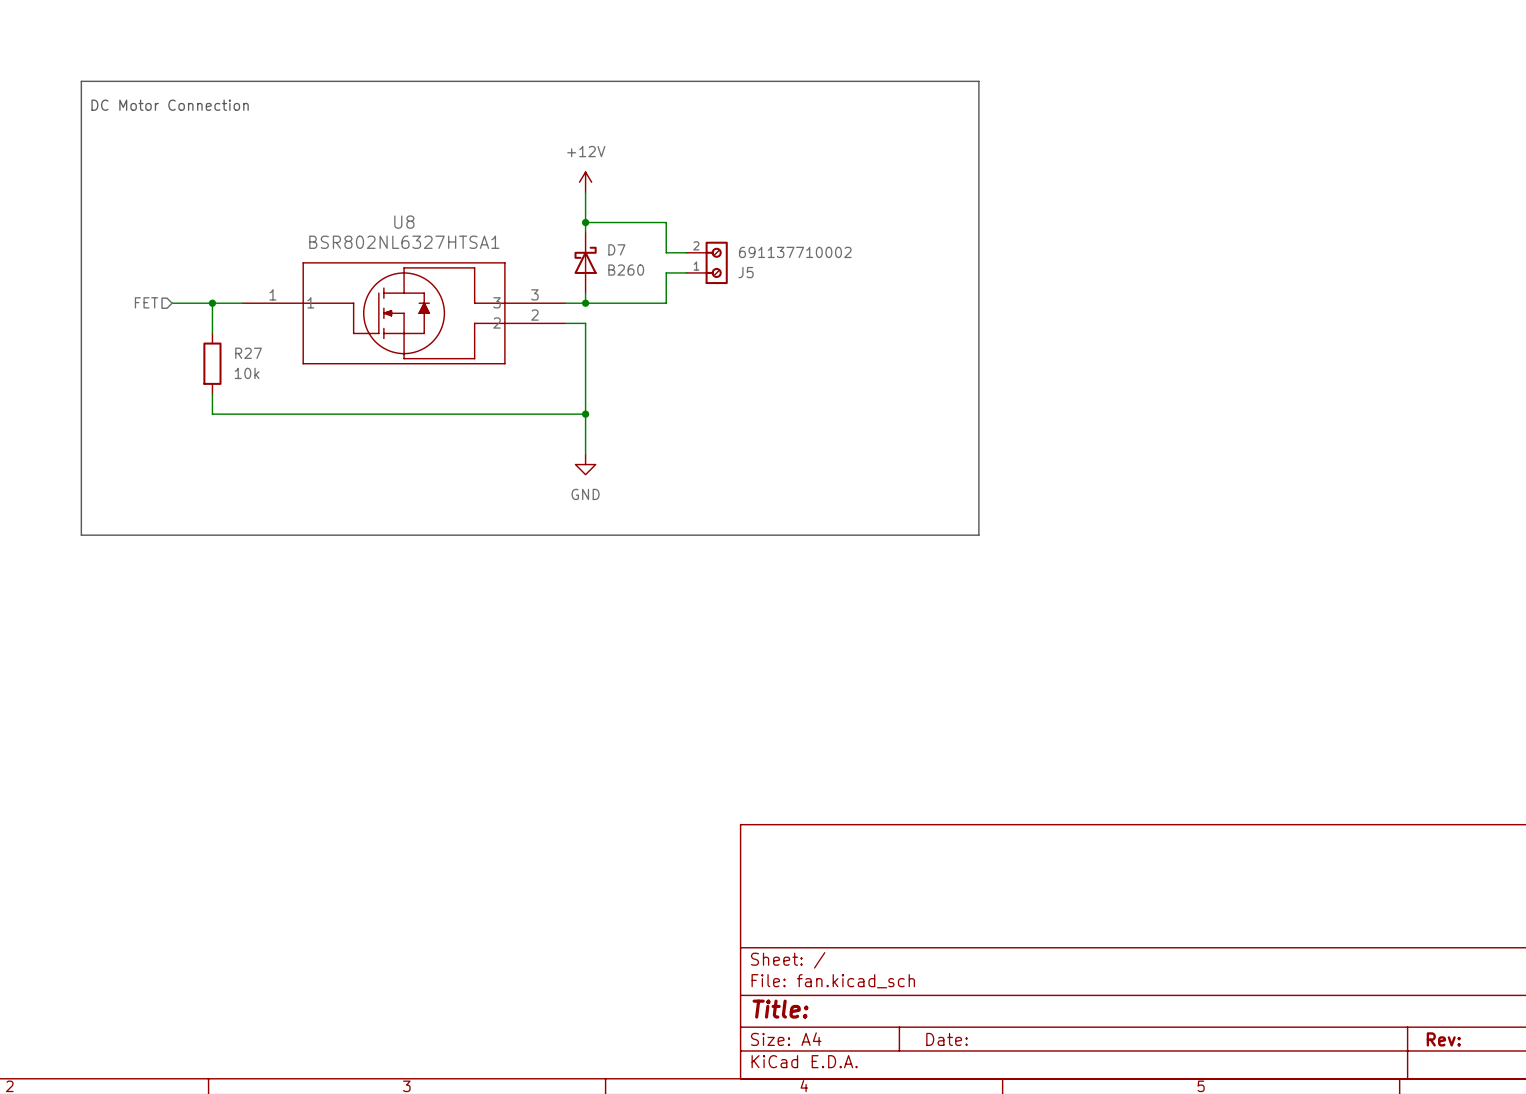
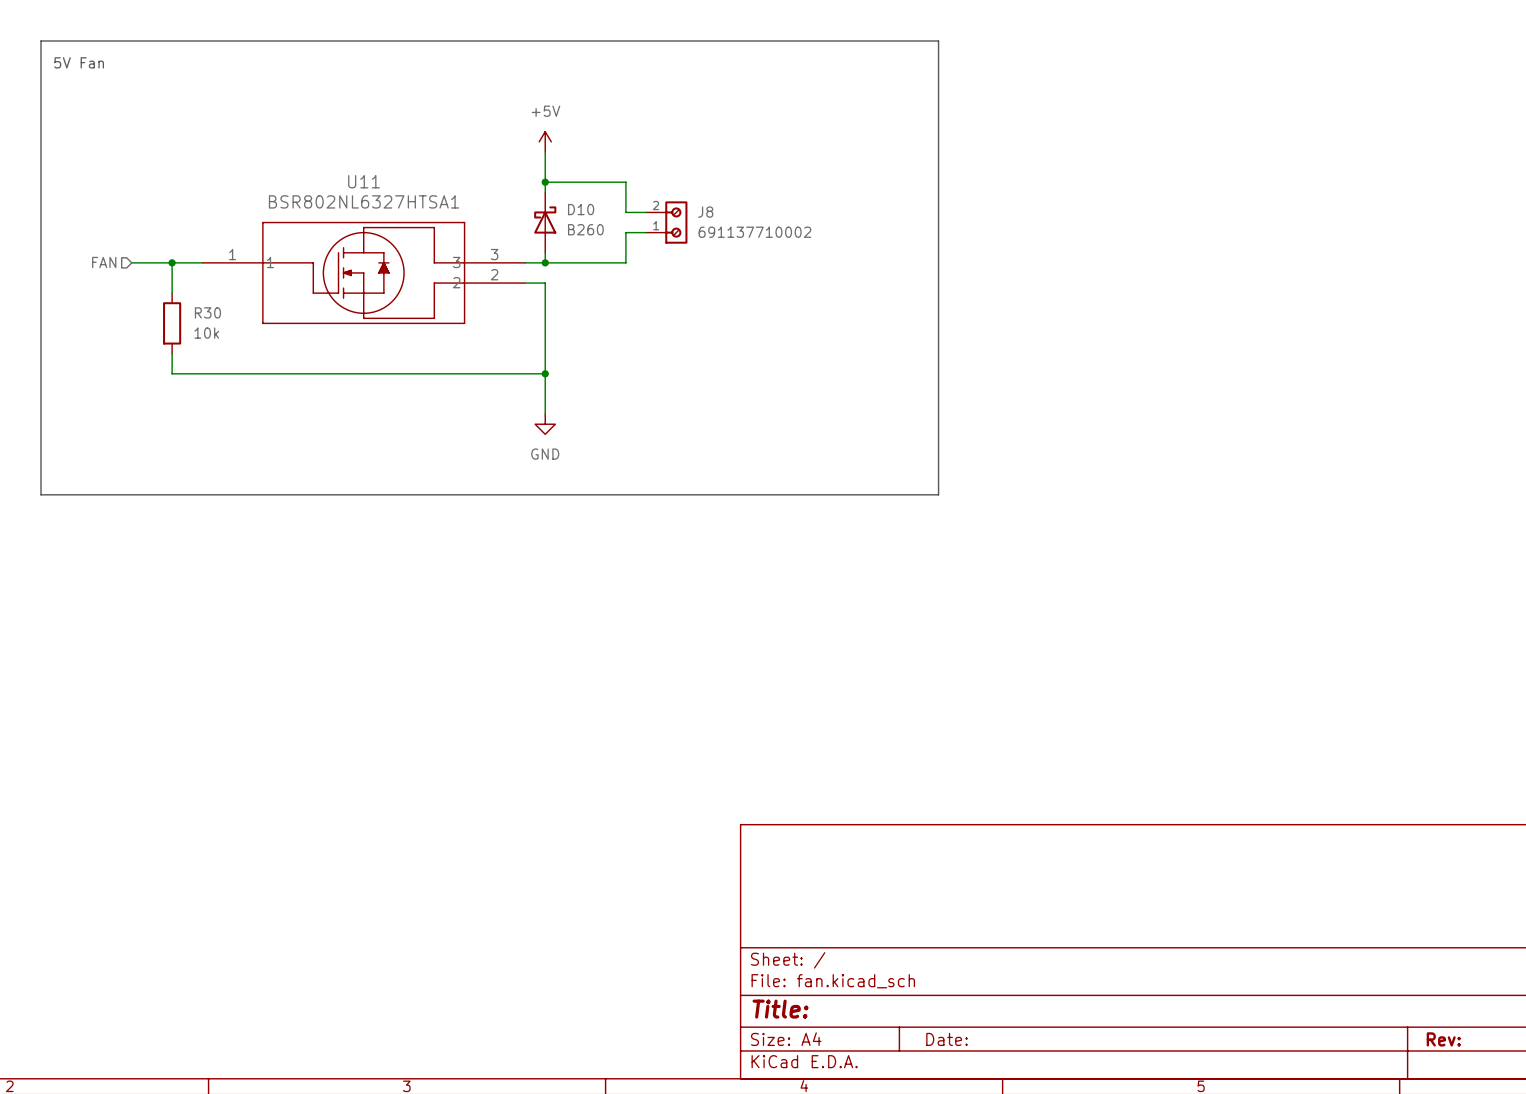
text: none -> 5V Fan (79, 62)
line: (81, 81) (978, 81) (978, 535) (81, 535) (81, 81) -> (41, 41) (938, 41) (938, 494) (41, 494) (41, 41)
text: DC Motor Connection (170, 105) -> none
power symbol: none -> +5V (545, 141)
junction: none -> (545, 182)
power symbol: +12V (585, 182) -> none
wire: (585, 192) (585, 232) -> (545, 151) (545, 192)
D10: none -> B260 (545, 222)
wire: (585, 222) (666, 222) (666, 252) (686, 252) -> (545, 182) (625, 182) (625, 212) (646, 212)
junction: (585, 222) -> none
J8: none -> 691137710002 (666, 222)
hierarchical label: none -> FAN (104, 262)
junction: none -> (172, 262)
junction: none -> (545, 262)
D7: B260 (585, 262) -> none
J5: 691137710002 (707, 262) -> none
U11: none -> BSR802NL6327HTSA1 (363, 272)
wire: (686, 272) (666, 272) (666, 303) (565, 303) -> (646, 232) (625, 232) (625, 262) (525, 262)
wire: (585, 293) (585, 303) -> (545, 252) (545, 262)
hierarchical label: FET (146, 302) -> none
wire: (172, 303) (242, 303) -> (131, 262) (202, 262)
wire: (212, 303) (212, 333) -> (172, 262) (172, 293)
junction: (212, 303) -> none
junction: (585, 303) -> none
U8: BSR802NL6327HTSA1 (404, 313) -> none
R30: none -> 10k (172, 323)
wire: (565, 323) (585, 323) (585, 454) -> (525, 283) (545, 283) (545, 414)
R27: 10k (212, 363) -> none
junction: none -> (545, 373)
wire: (212, 393) (212, 414) (585, 414) -> (172, 353) (172, 373) (545, 373)
junction: (585, 414) -> none
power symbol position: GND (585, 464) -> GND (545, 424)

